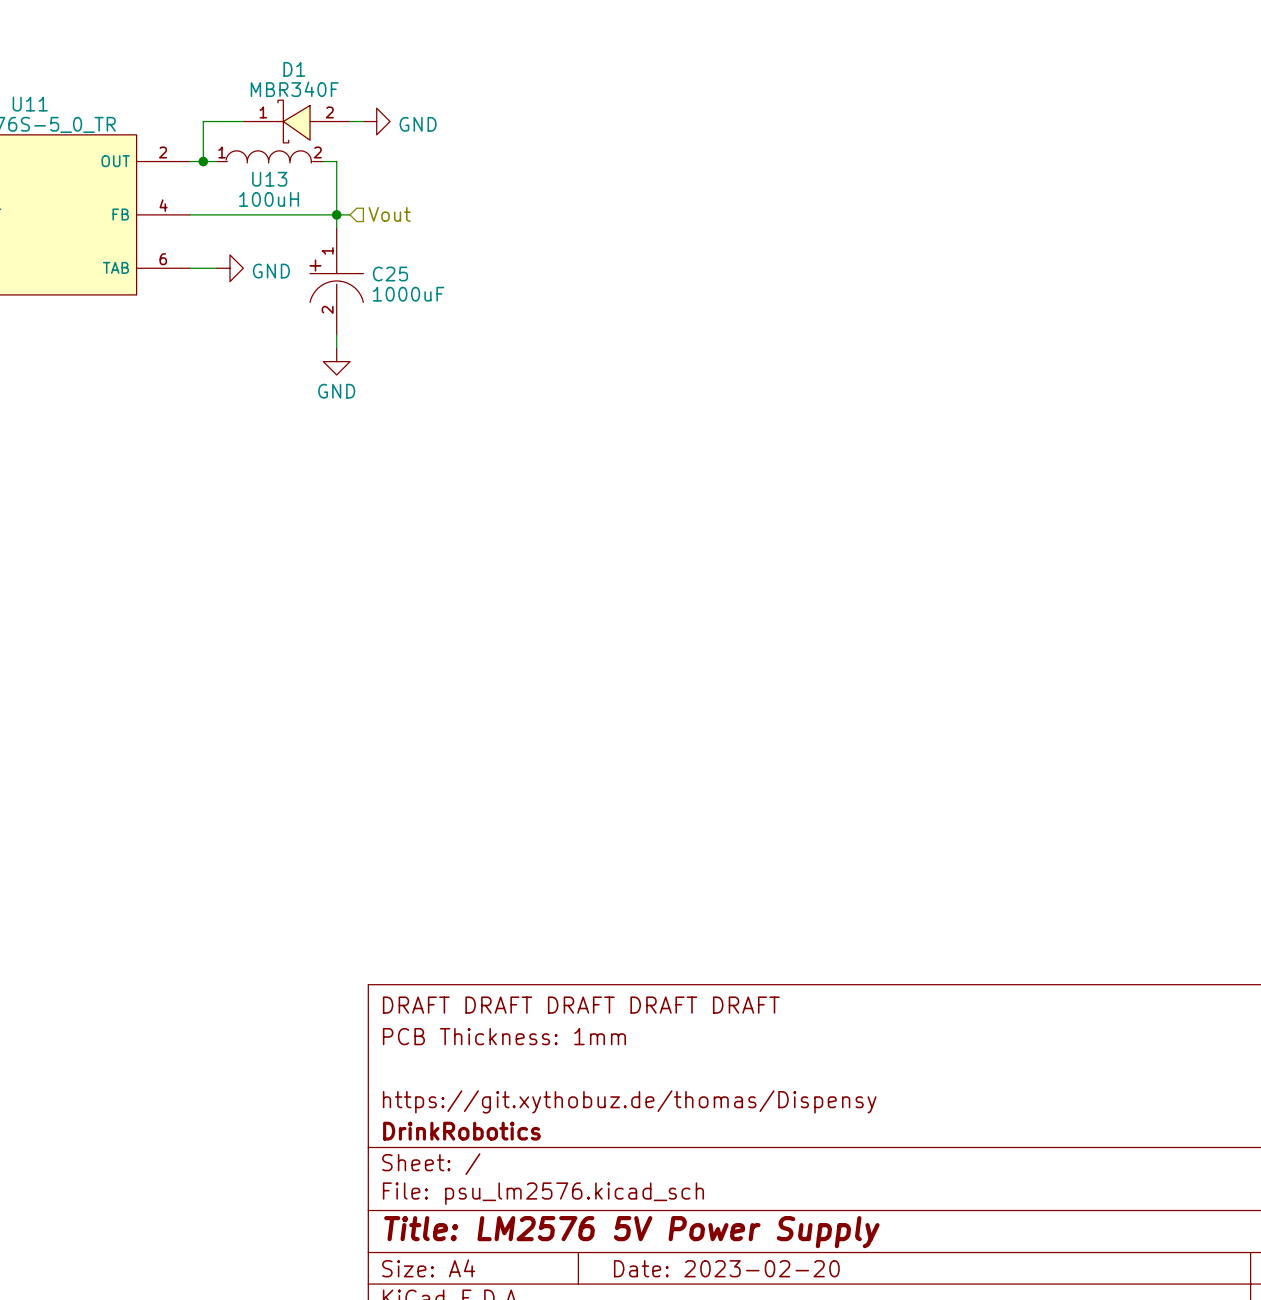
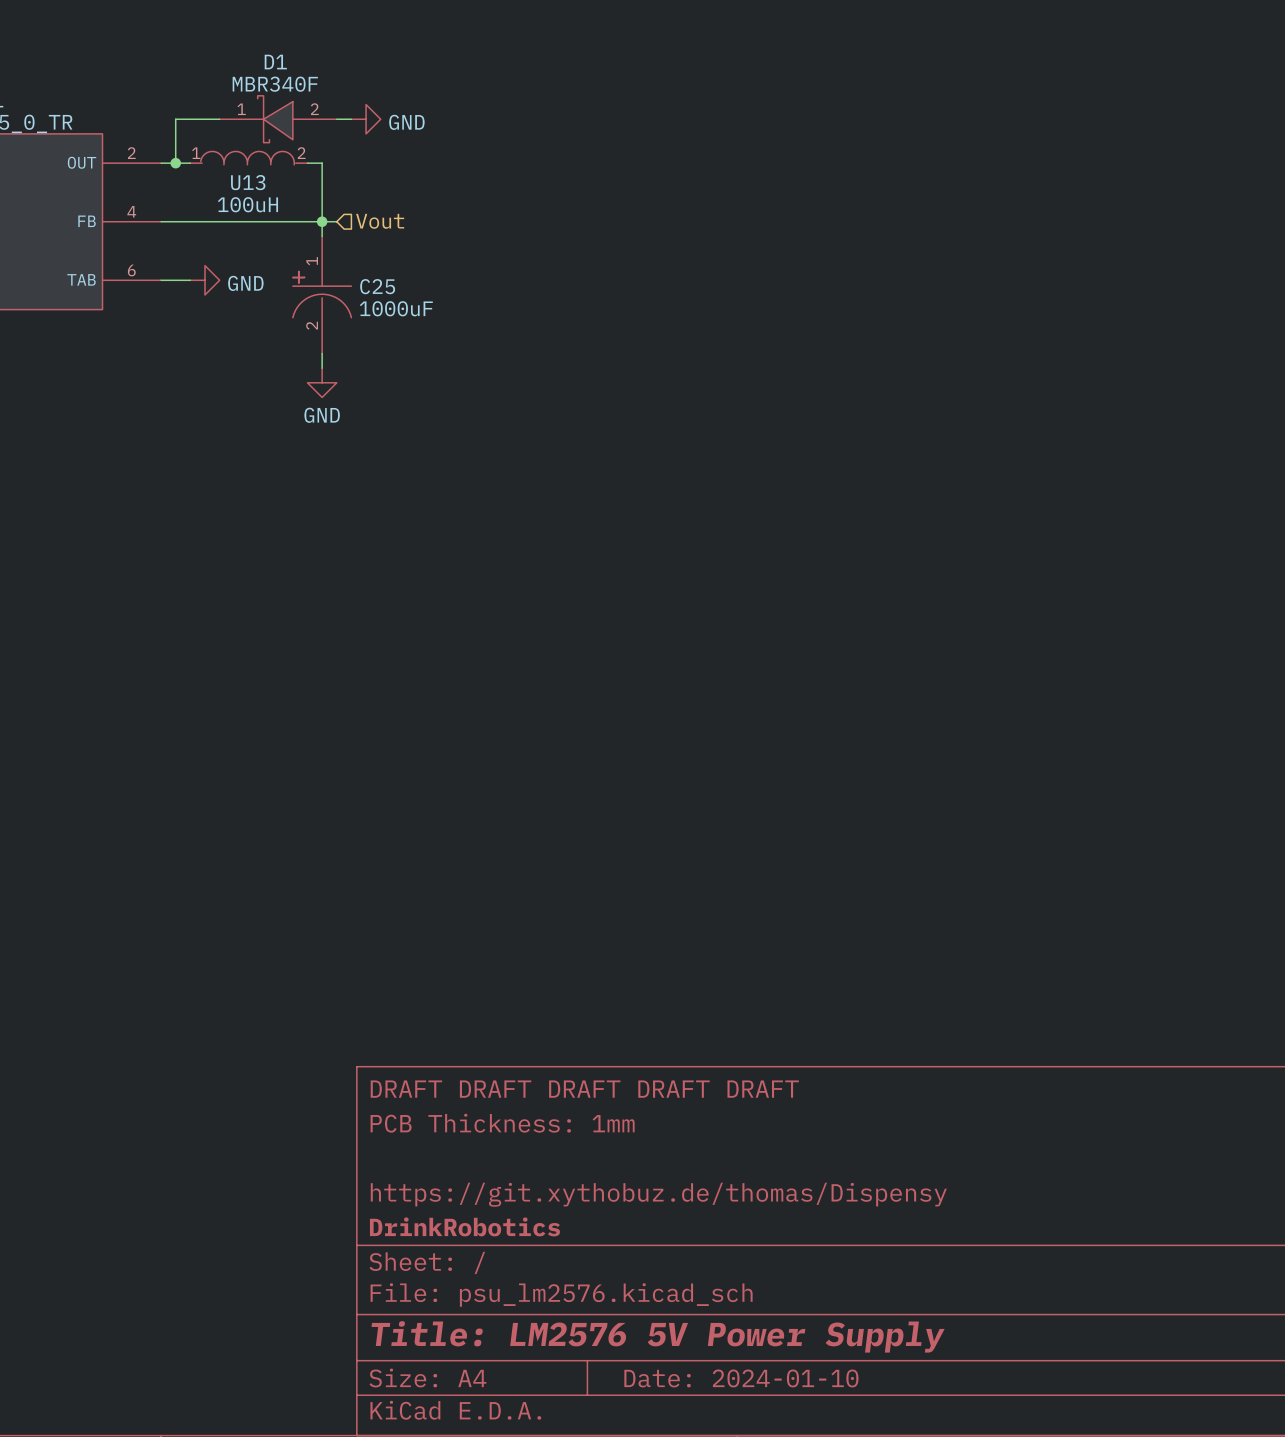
title block: Date: 2023-02-20 (726, 1268) -> Date: 2024-01-10 (741, 1378)

